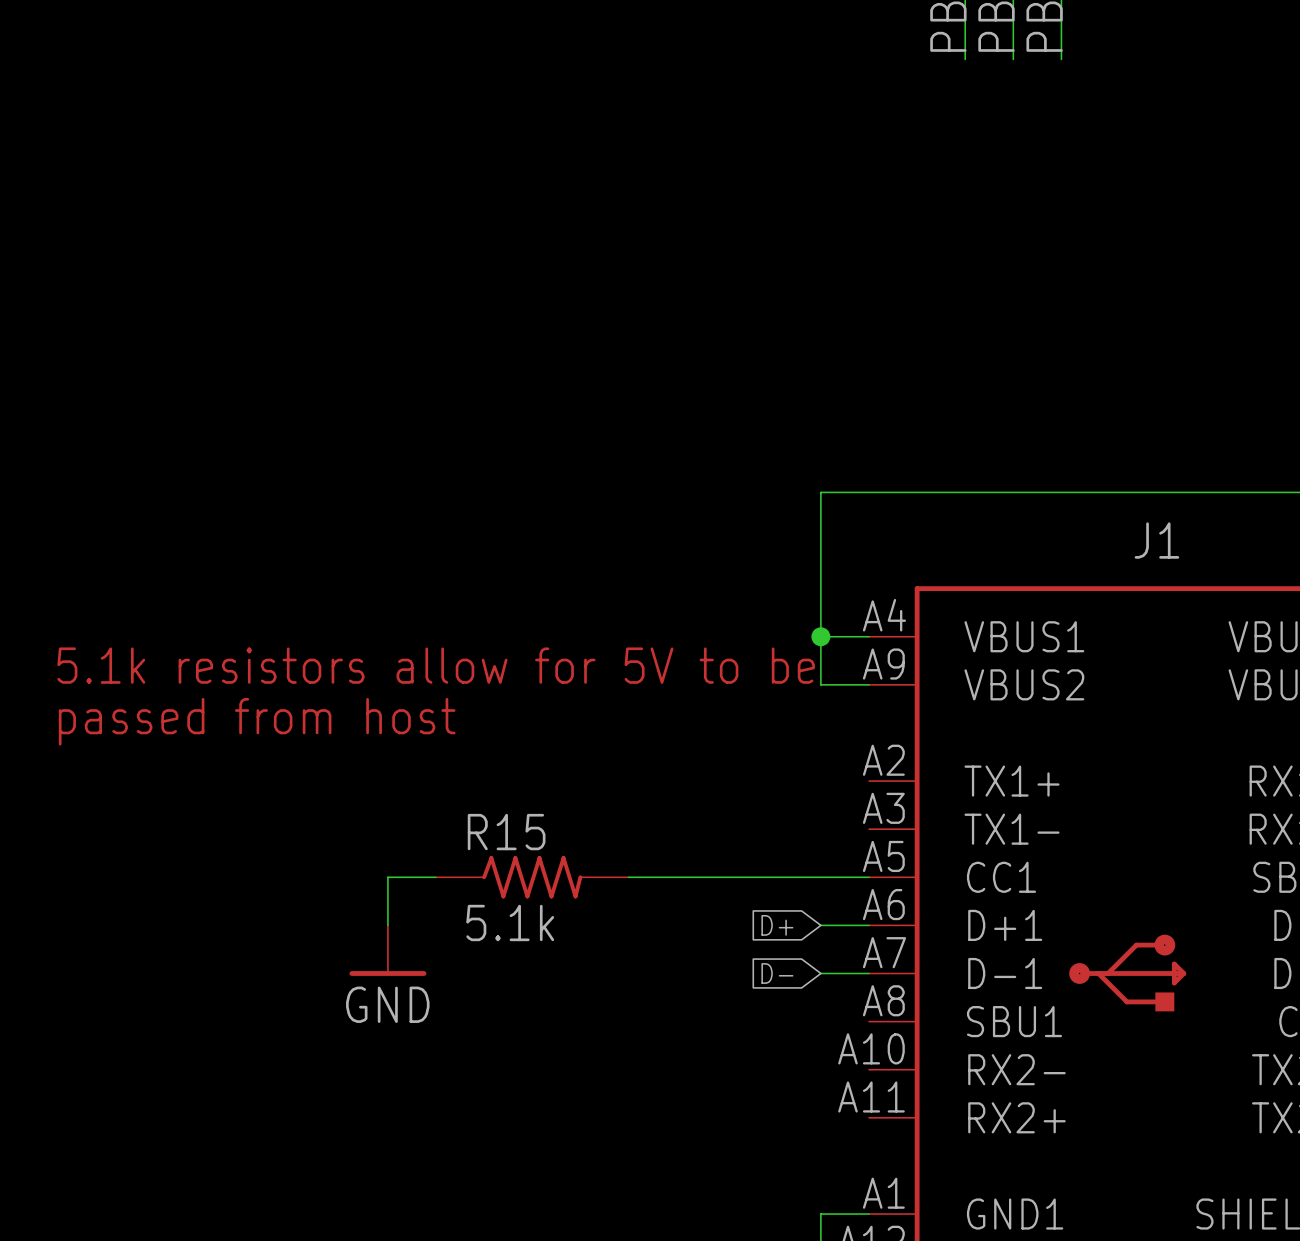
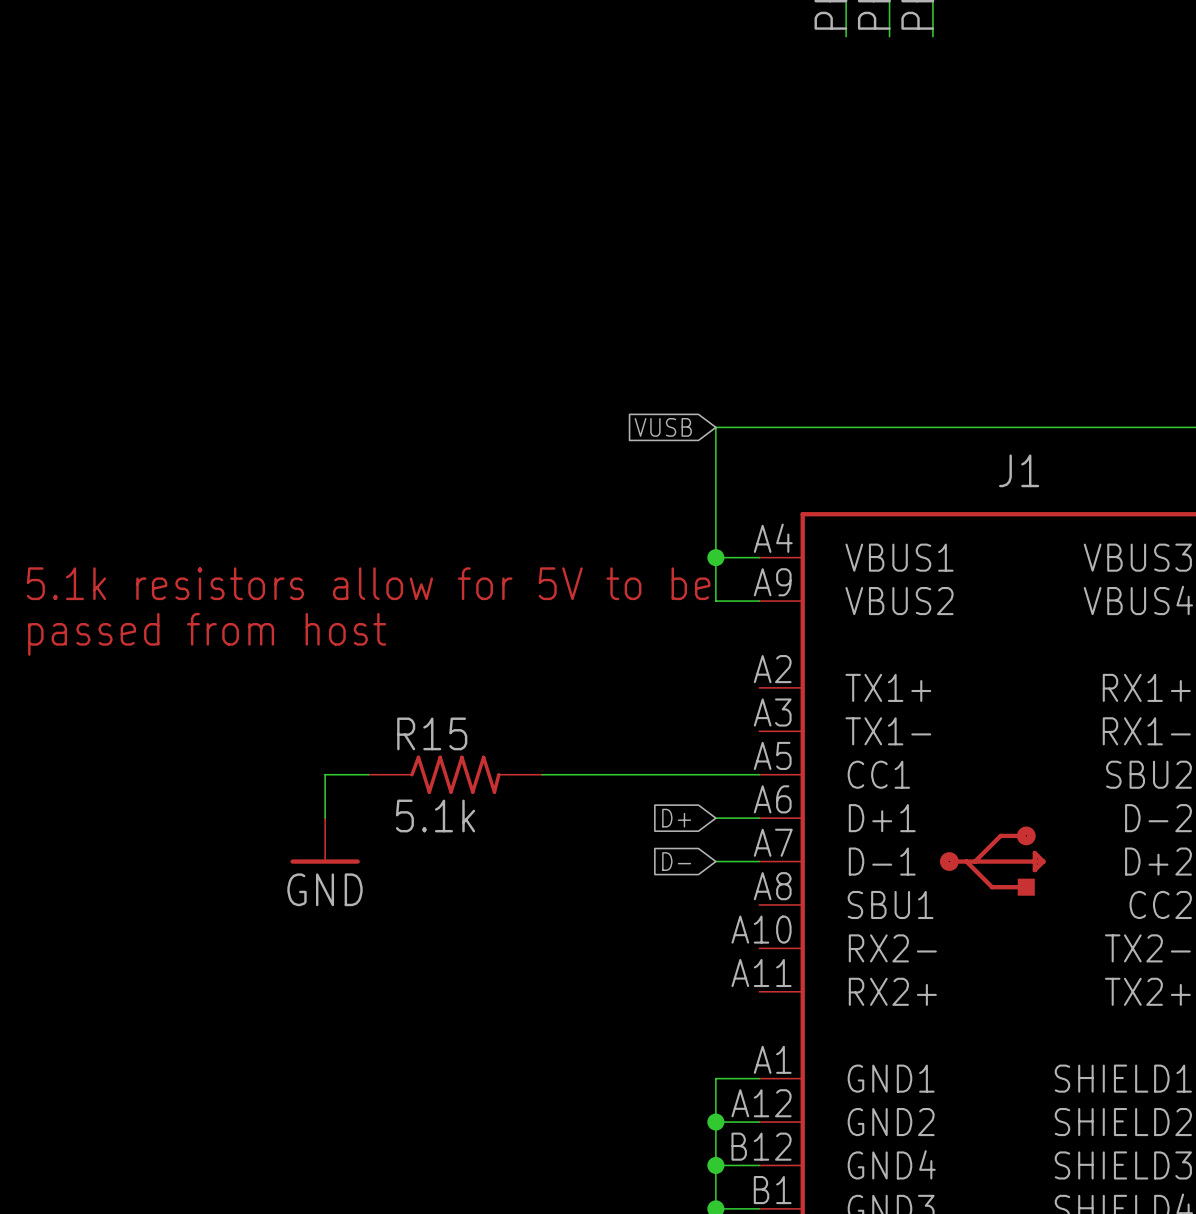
global label: none -> VUSB (663, 427)

